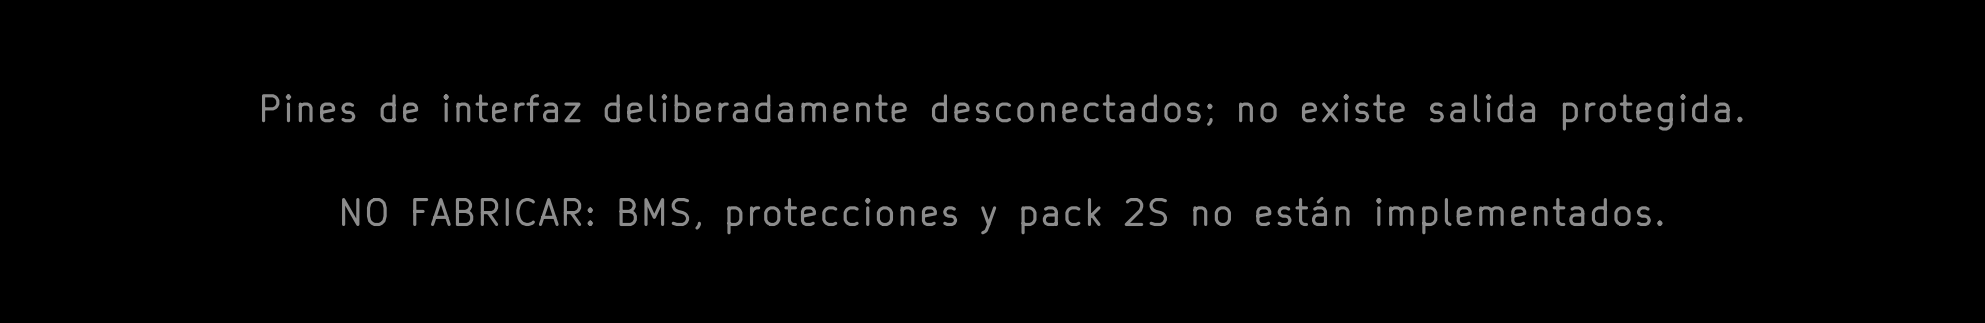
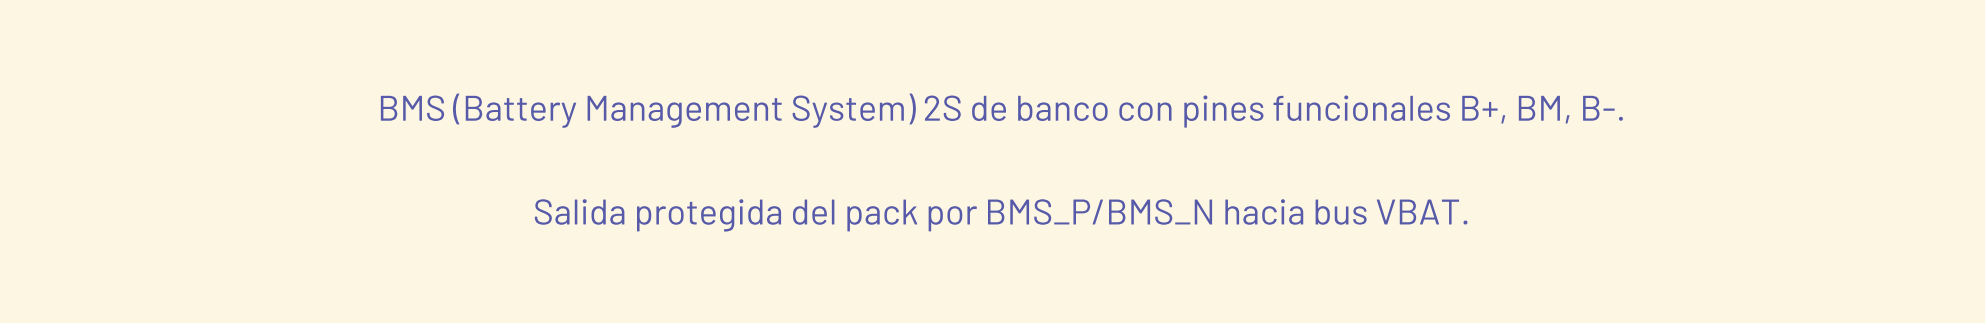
text: Pines de interfaz deliberadamente desconectados; no existe salida protegida. (1002, 112) -> BMS (Battery Management System) 2S de banco con pines funcionales B+, BM, B-. (1001, 110)
text: NO FABRICAR: BMS, protecciones y pack 2S no están implementados. (1002, 215) -> Salida protegida del pack por BMS_P/BMS_N hacia bus VBAT. (1001, 215)

